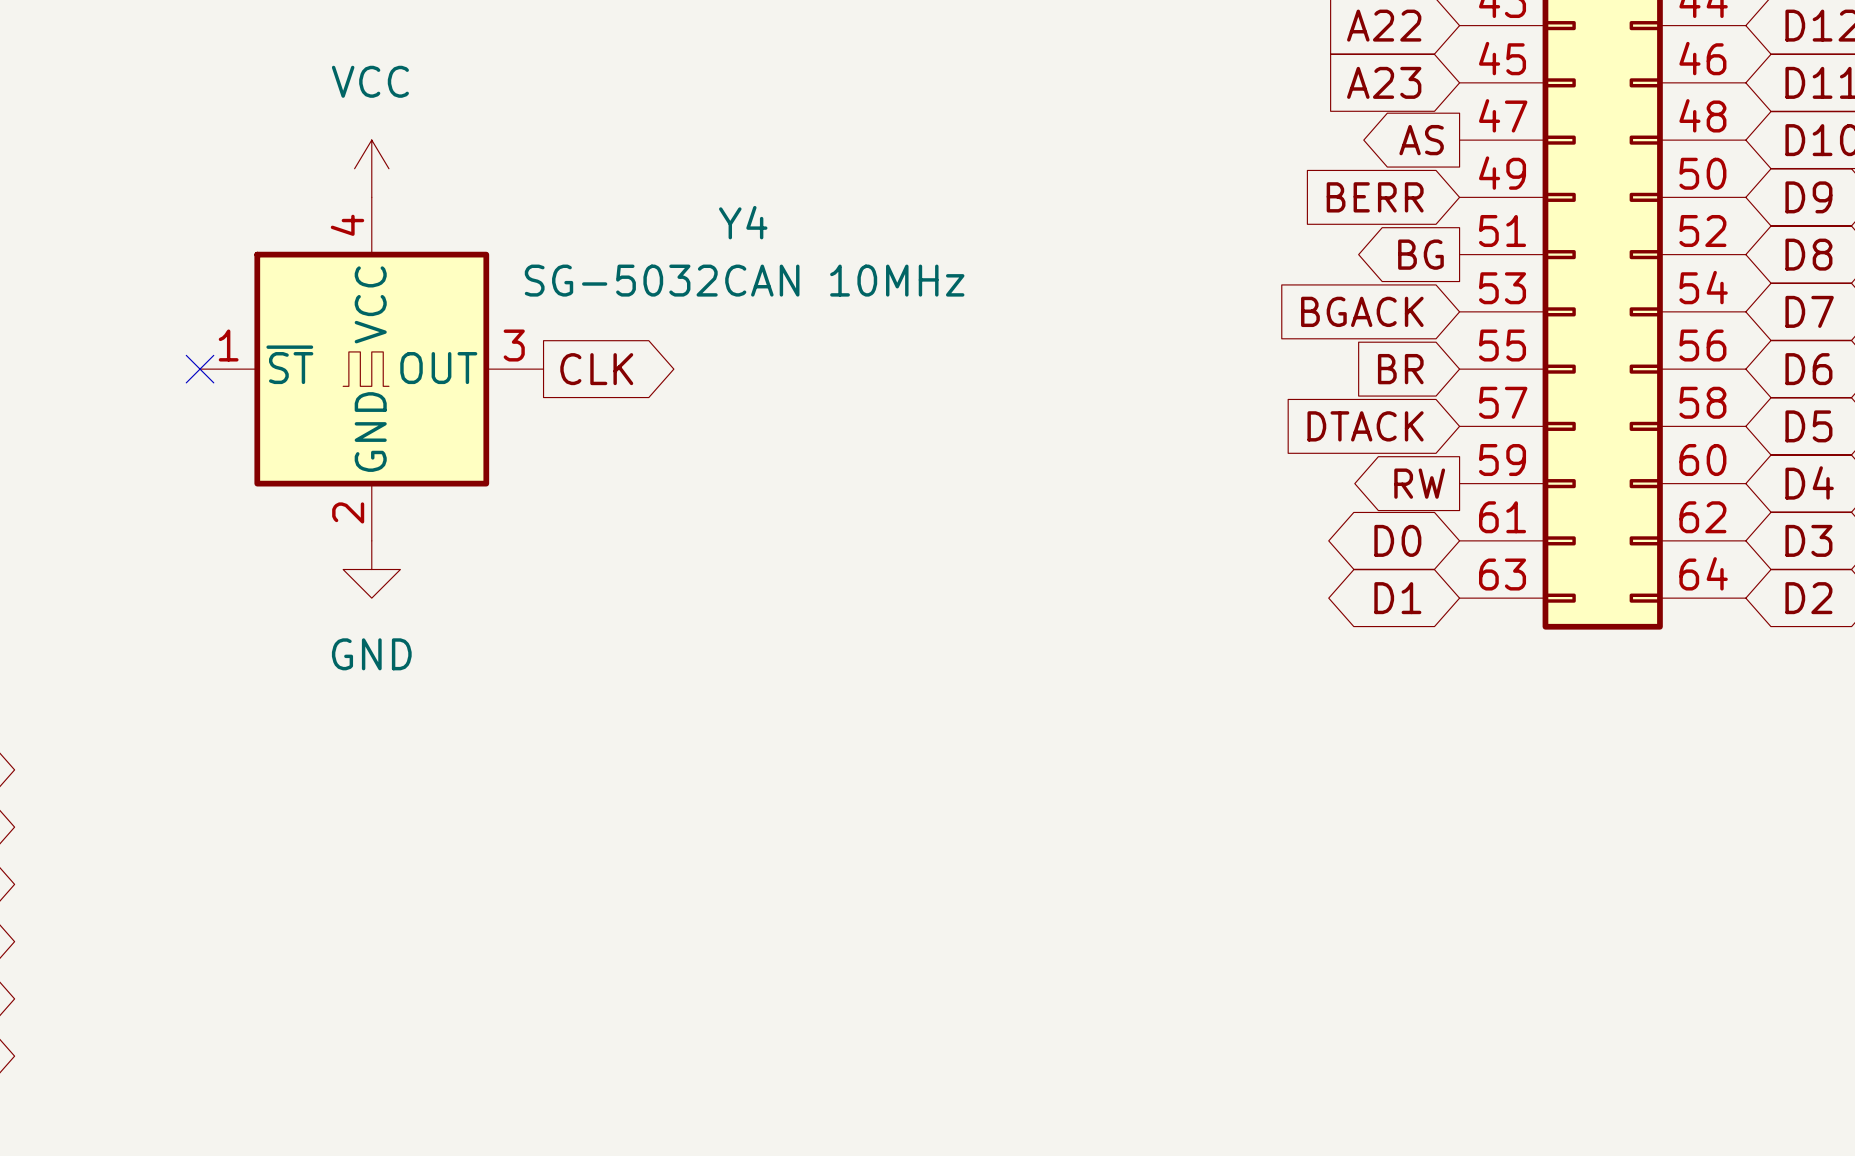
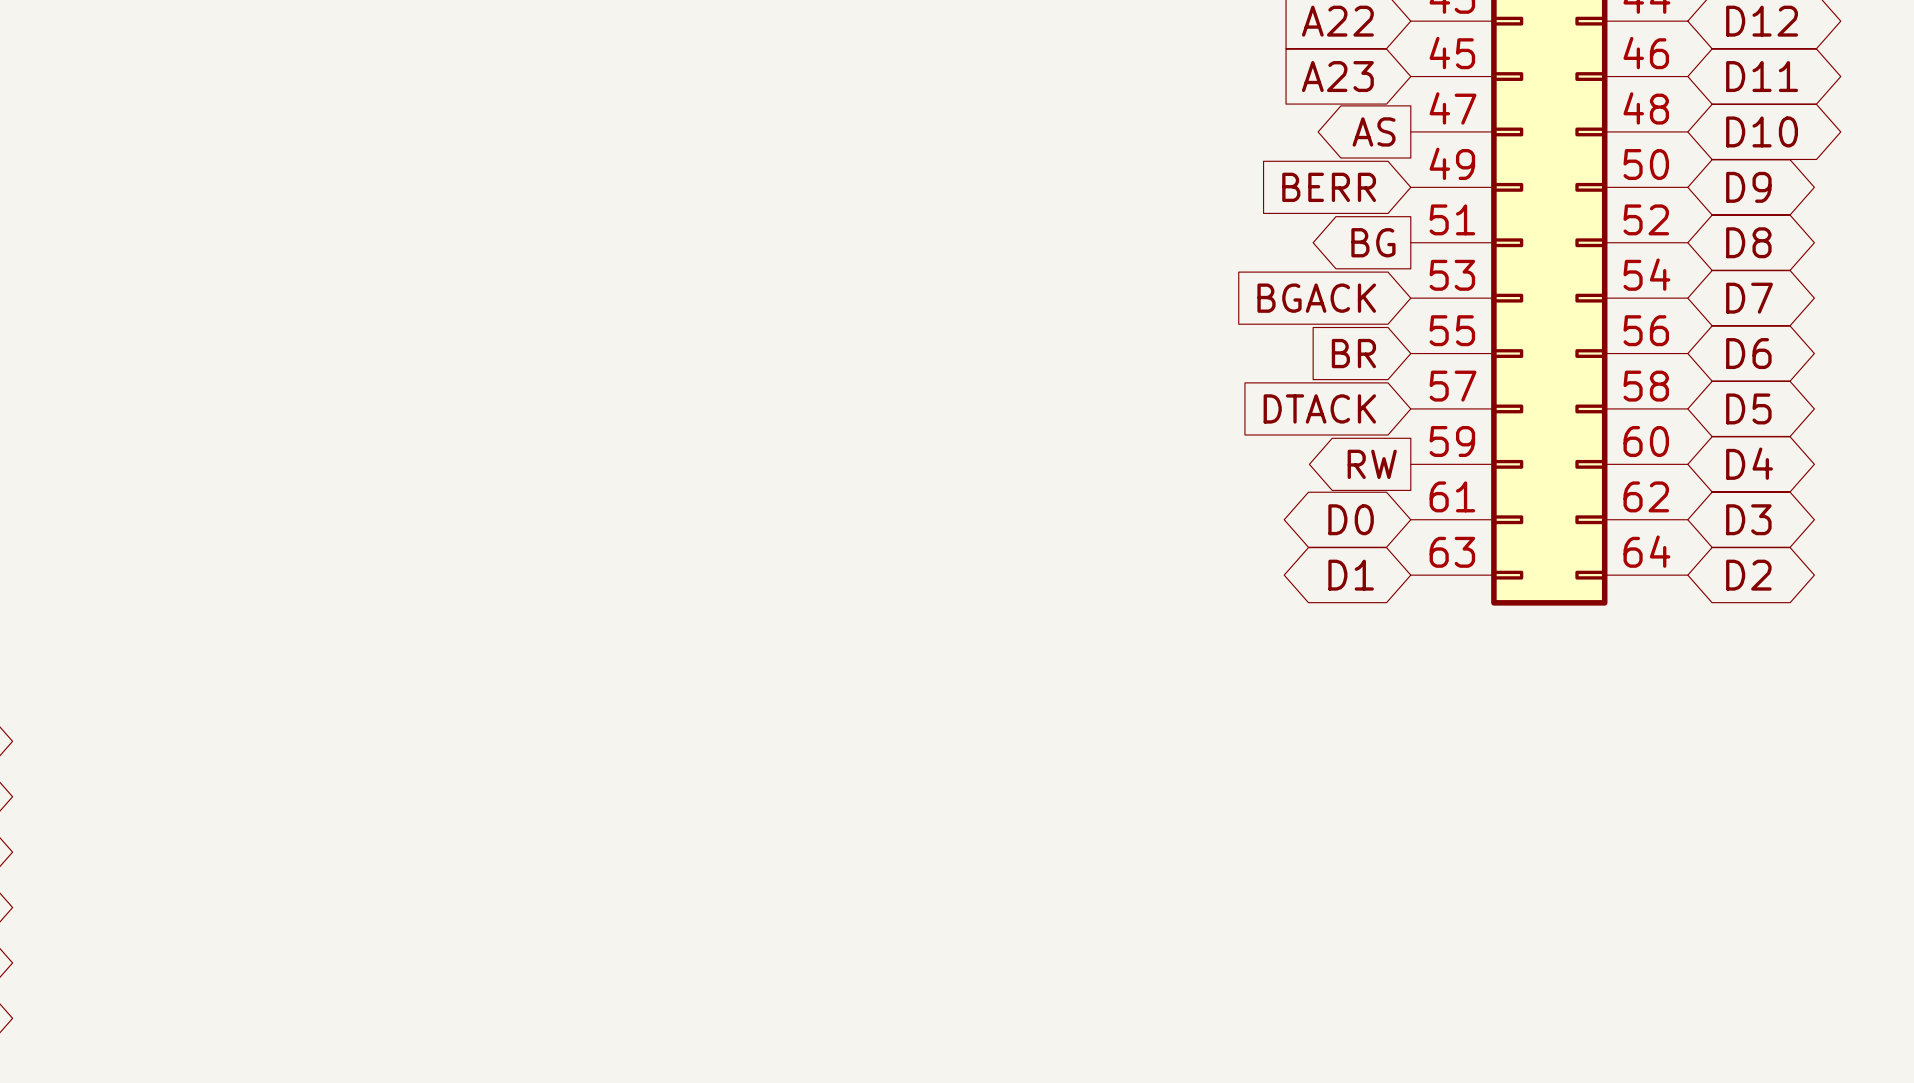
power symbol: VCC (371, 168) -> none
no-connect mark: (200, 369) -> none
Y4: SG-5032CAN 10MHz (371, 369) -> none
global label: CLK (596, 369) -> none
power symbol: GND (371, 569) -> none

